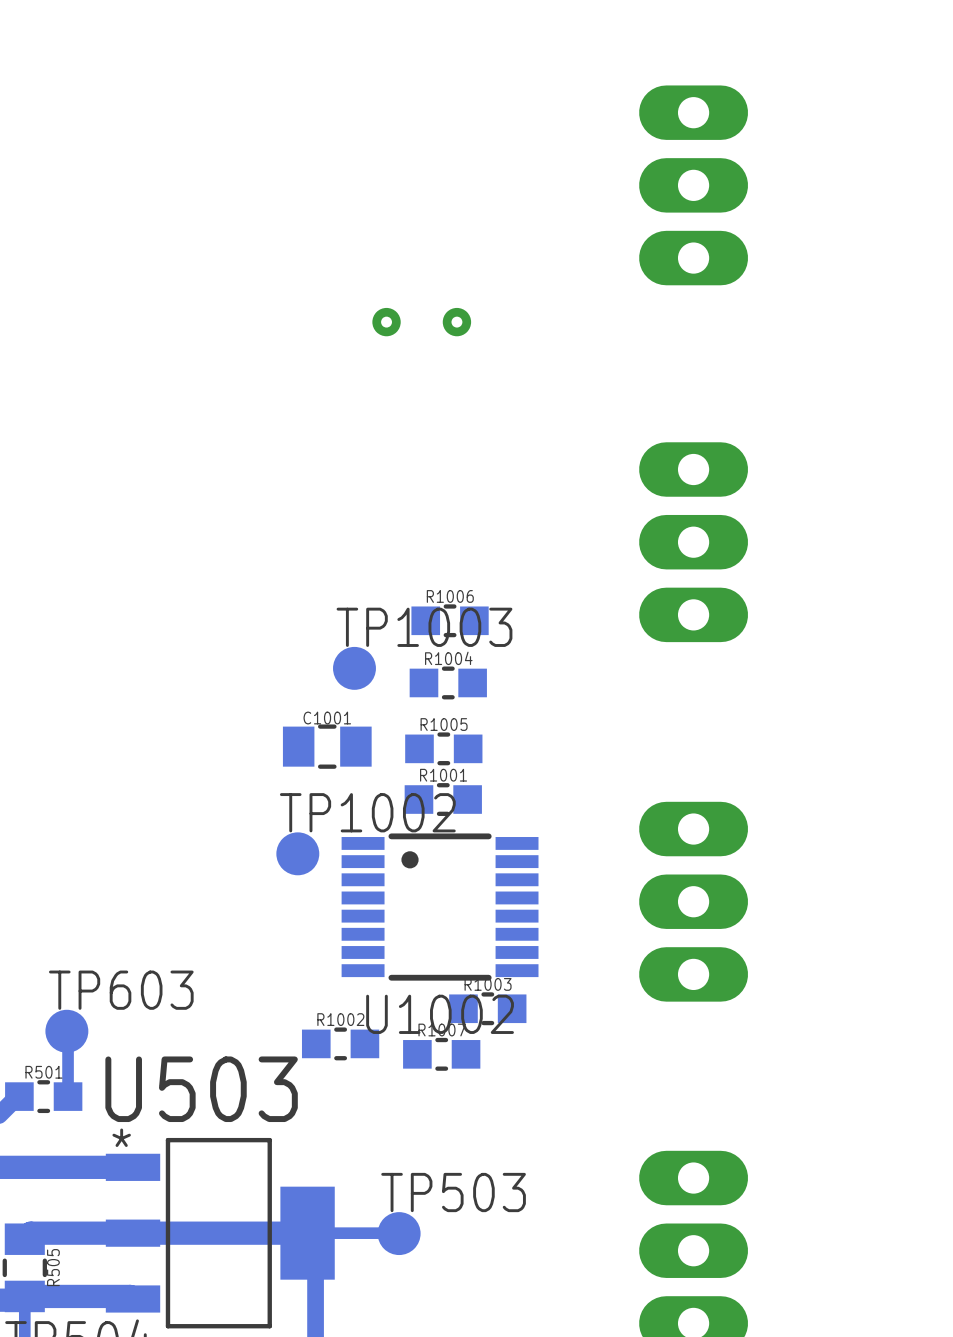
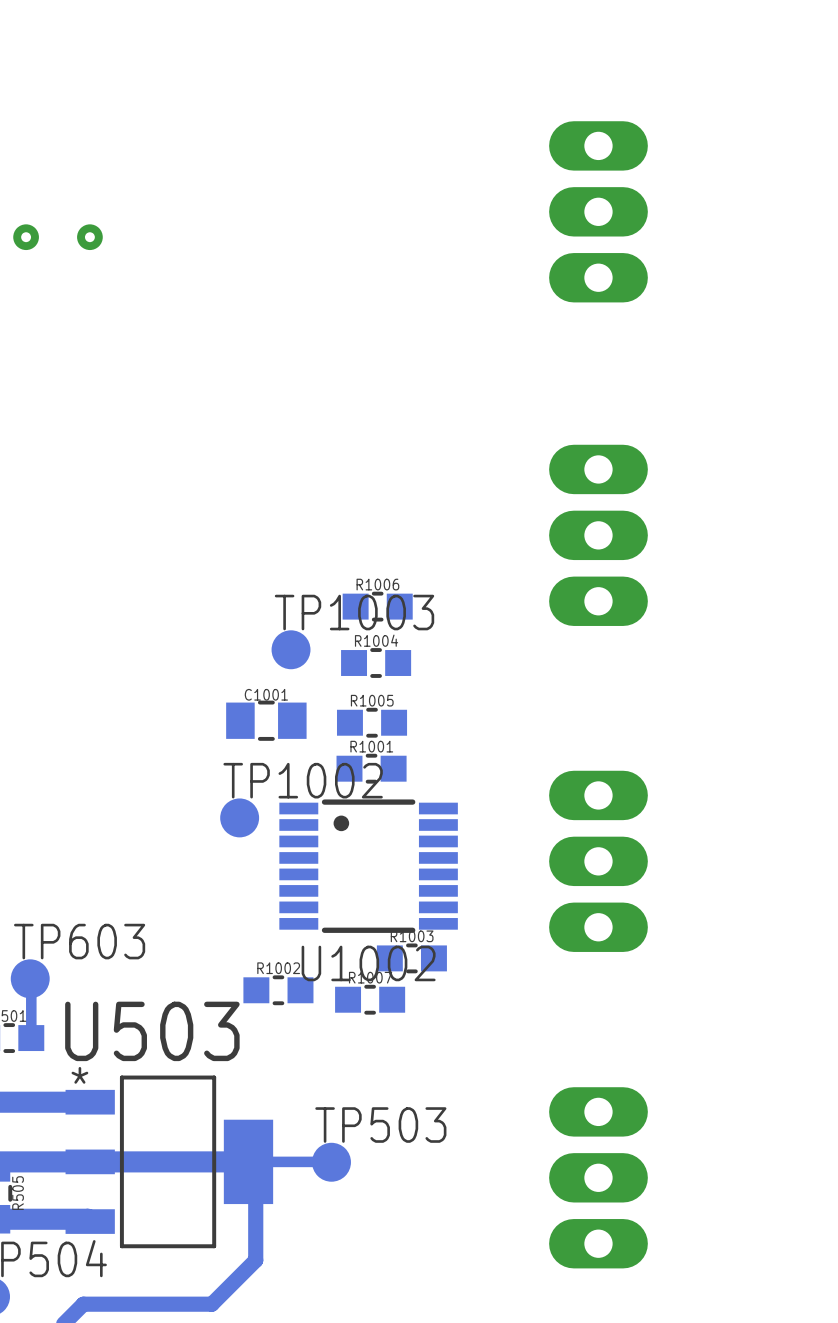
via: none -> (26, 237)
via: none -> (89, 237)
via: (386, 322) -> none
via: (456, 322) -> none

